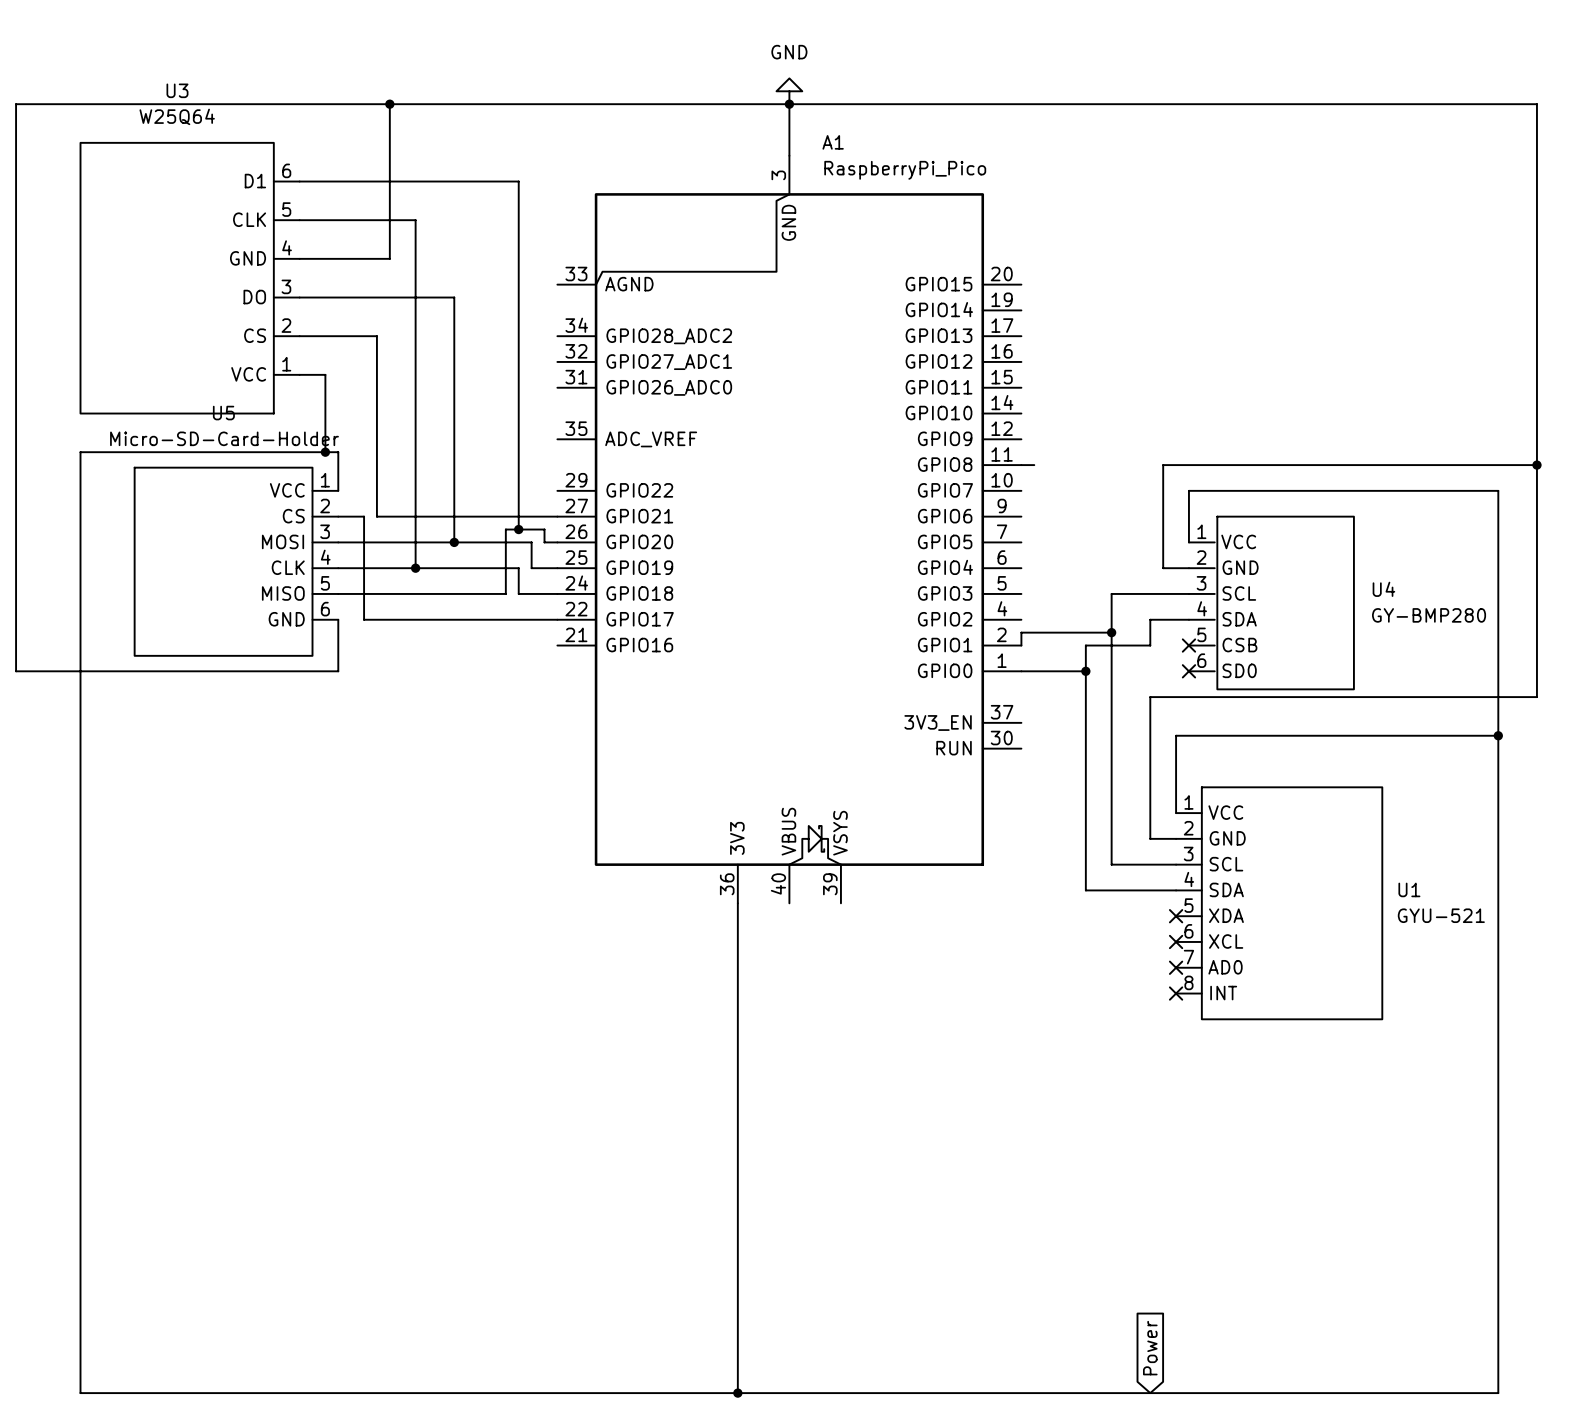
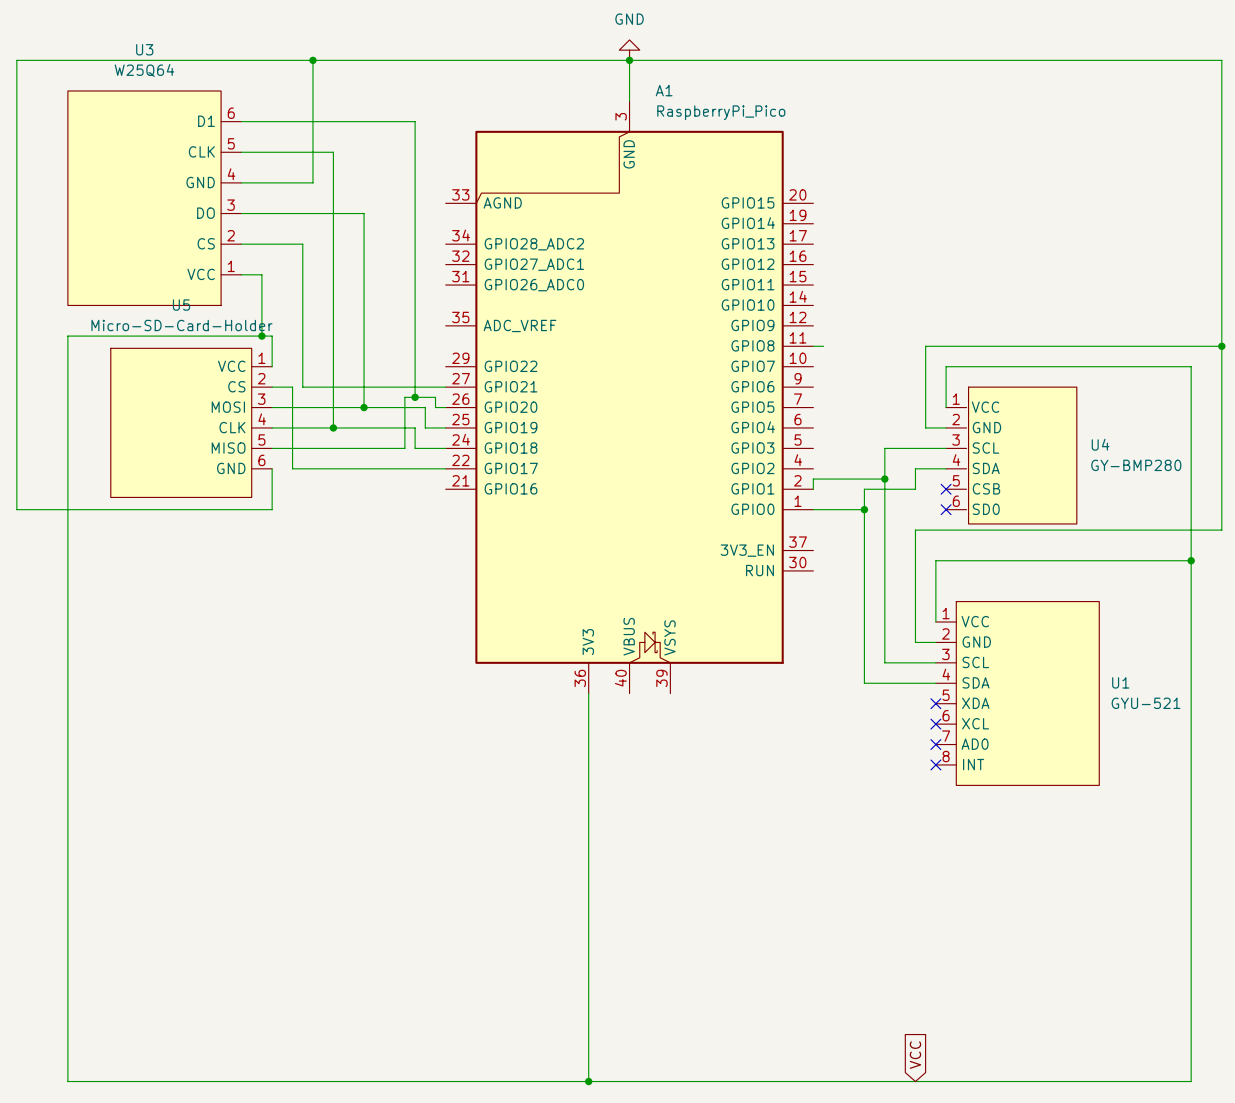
global label: Power (1150, 1348) -> VCC (915, 1055)

